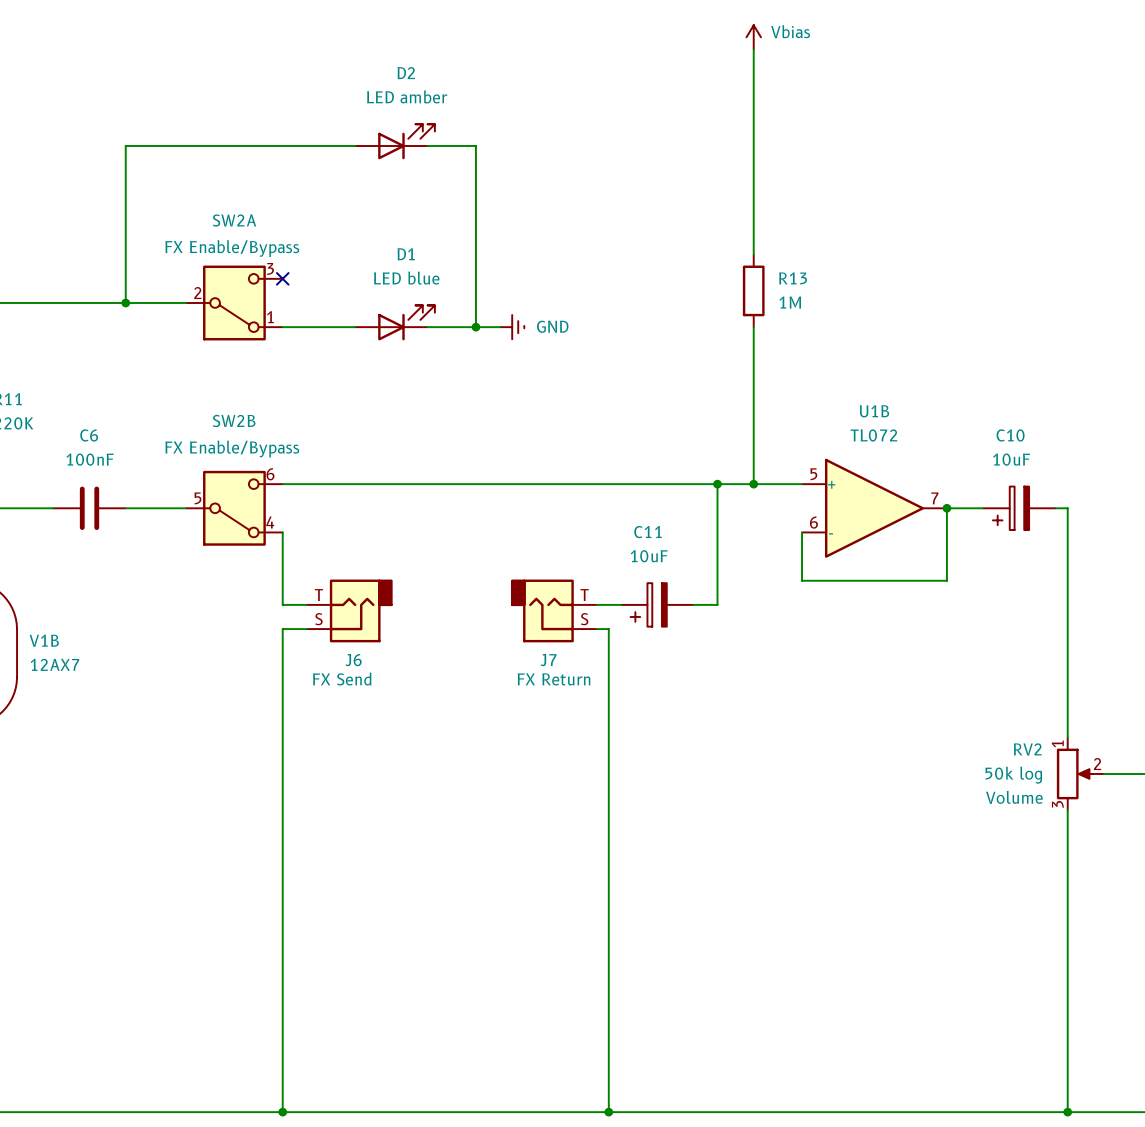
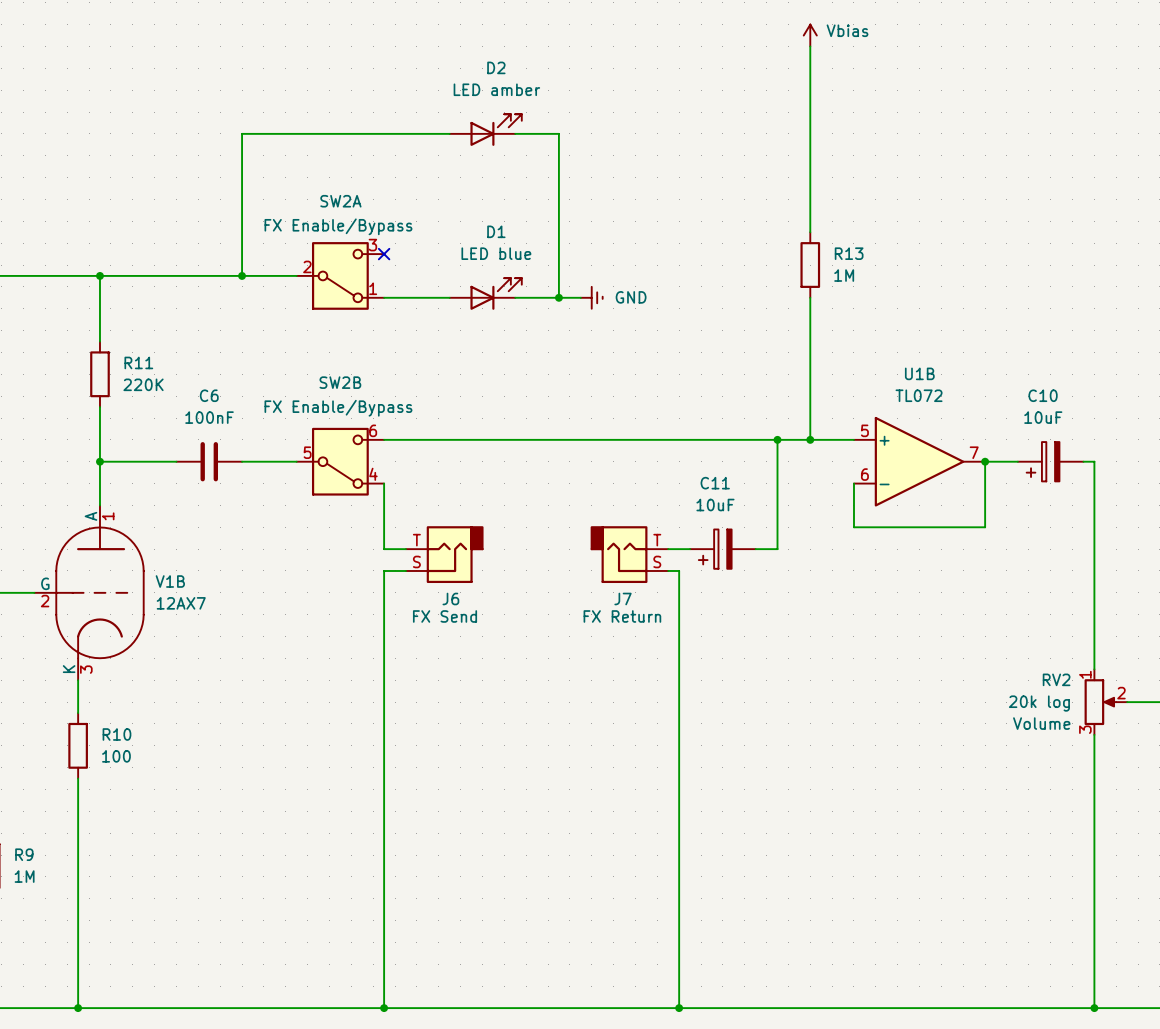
RV2 value: 50k log (1013, 775) -> 20k log (1039, 703)

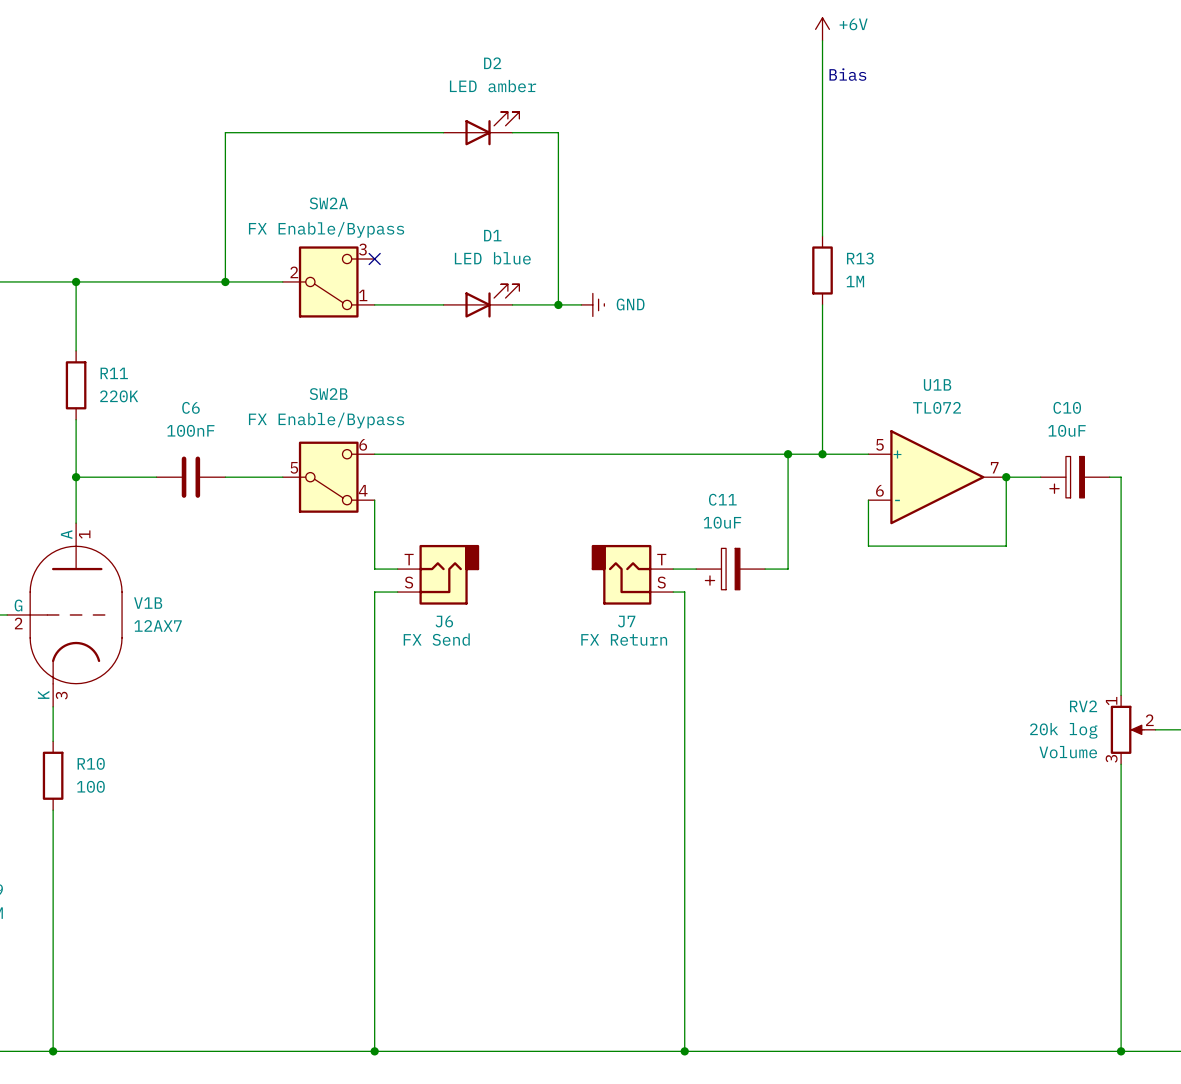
power symbol: Vbias (810, 35) -> +6V (822, 29)
text: none -> Bias (847, 74)

